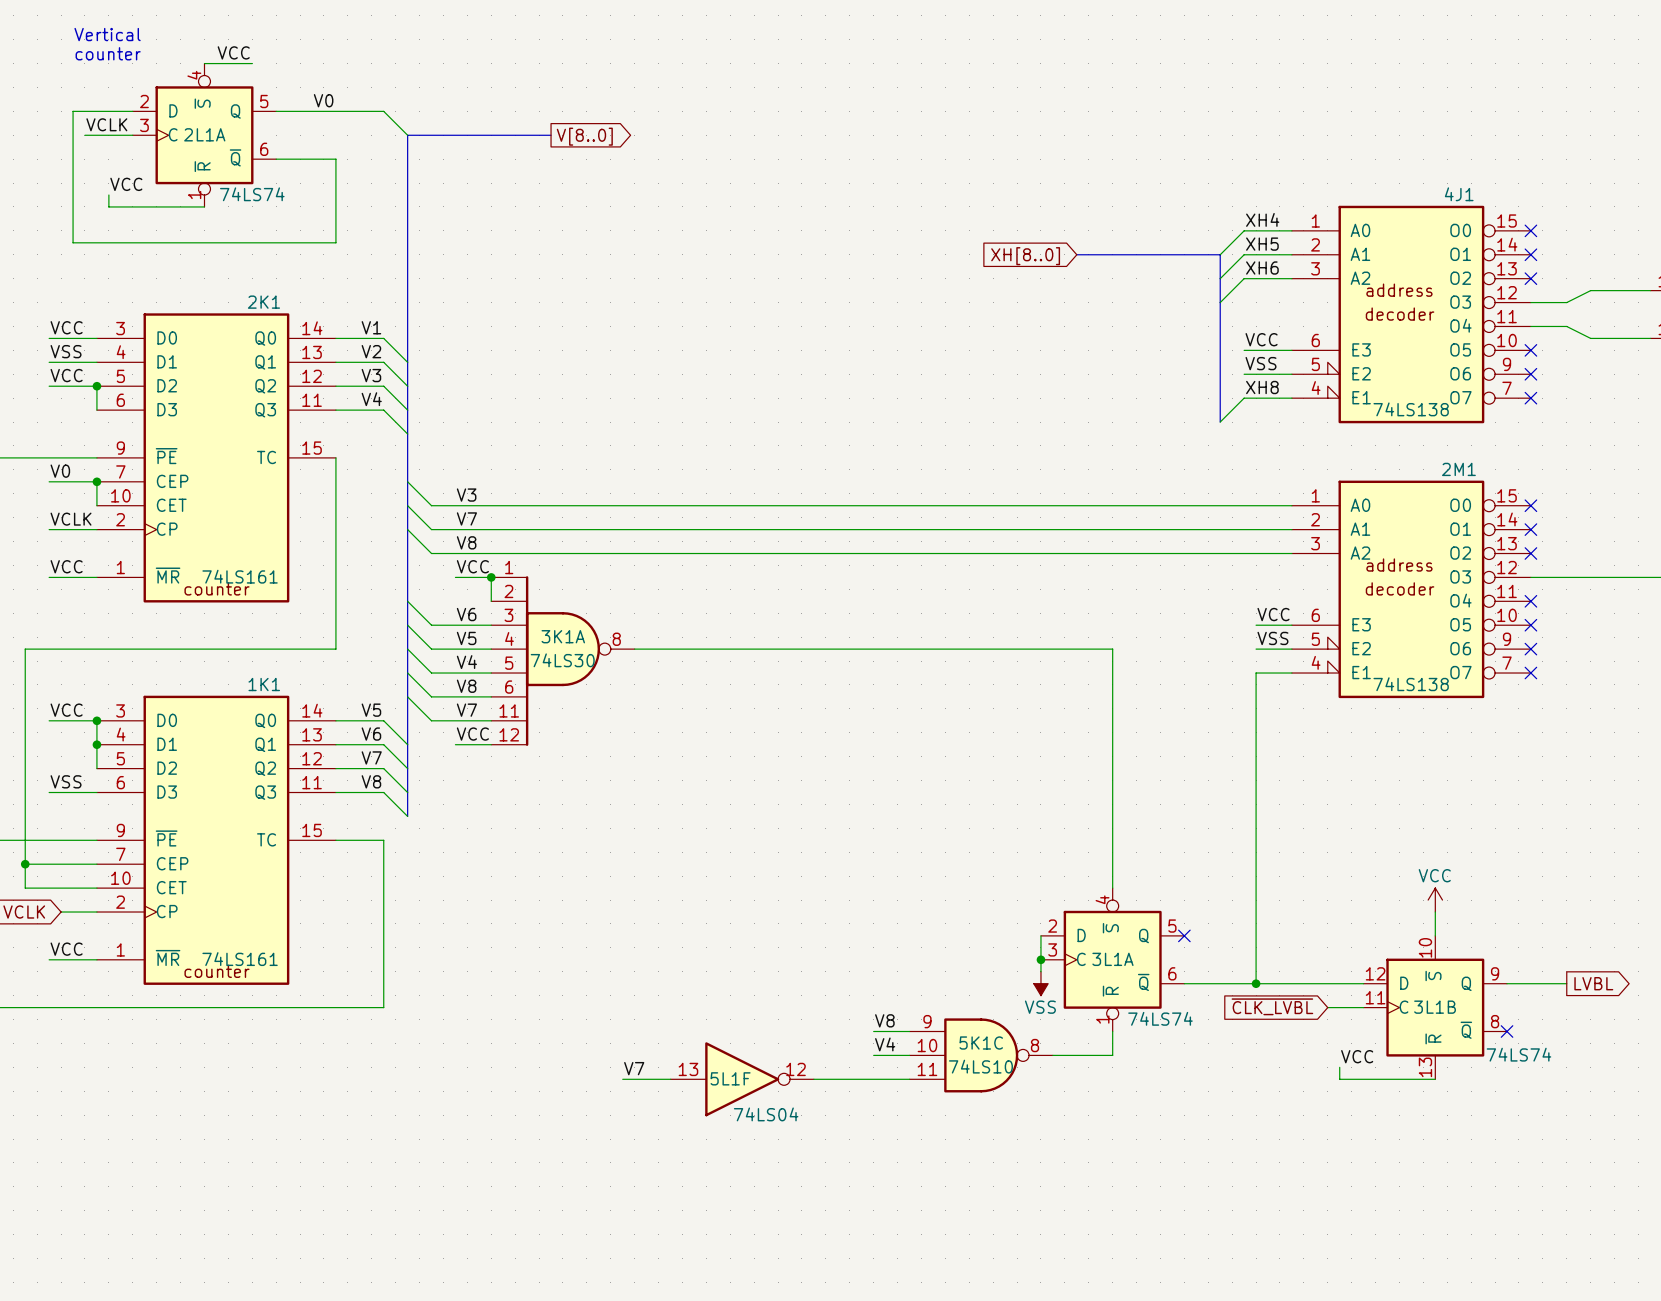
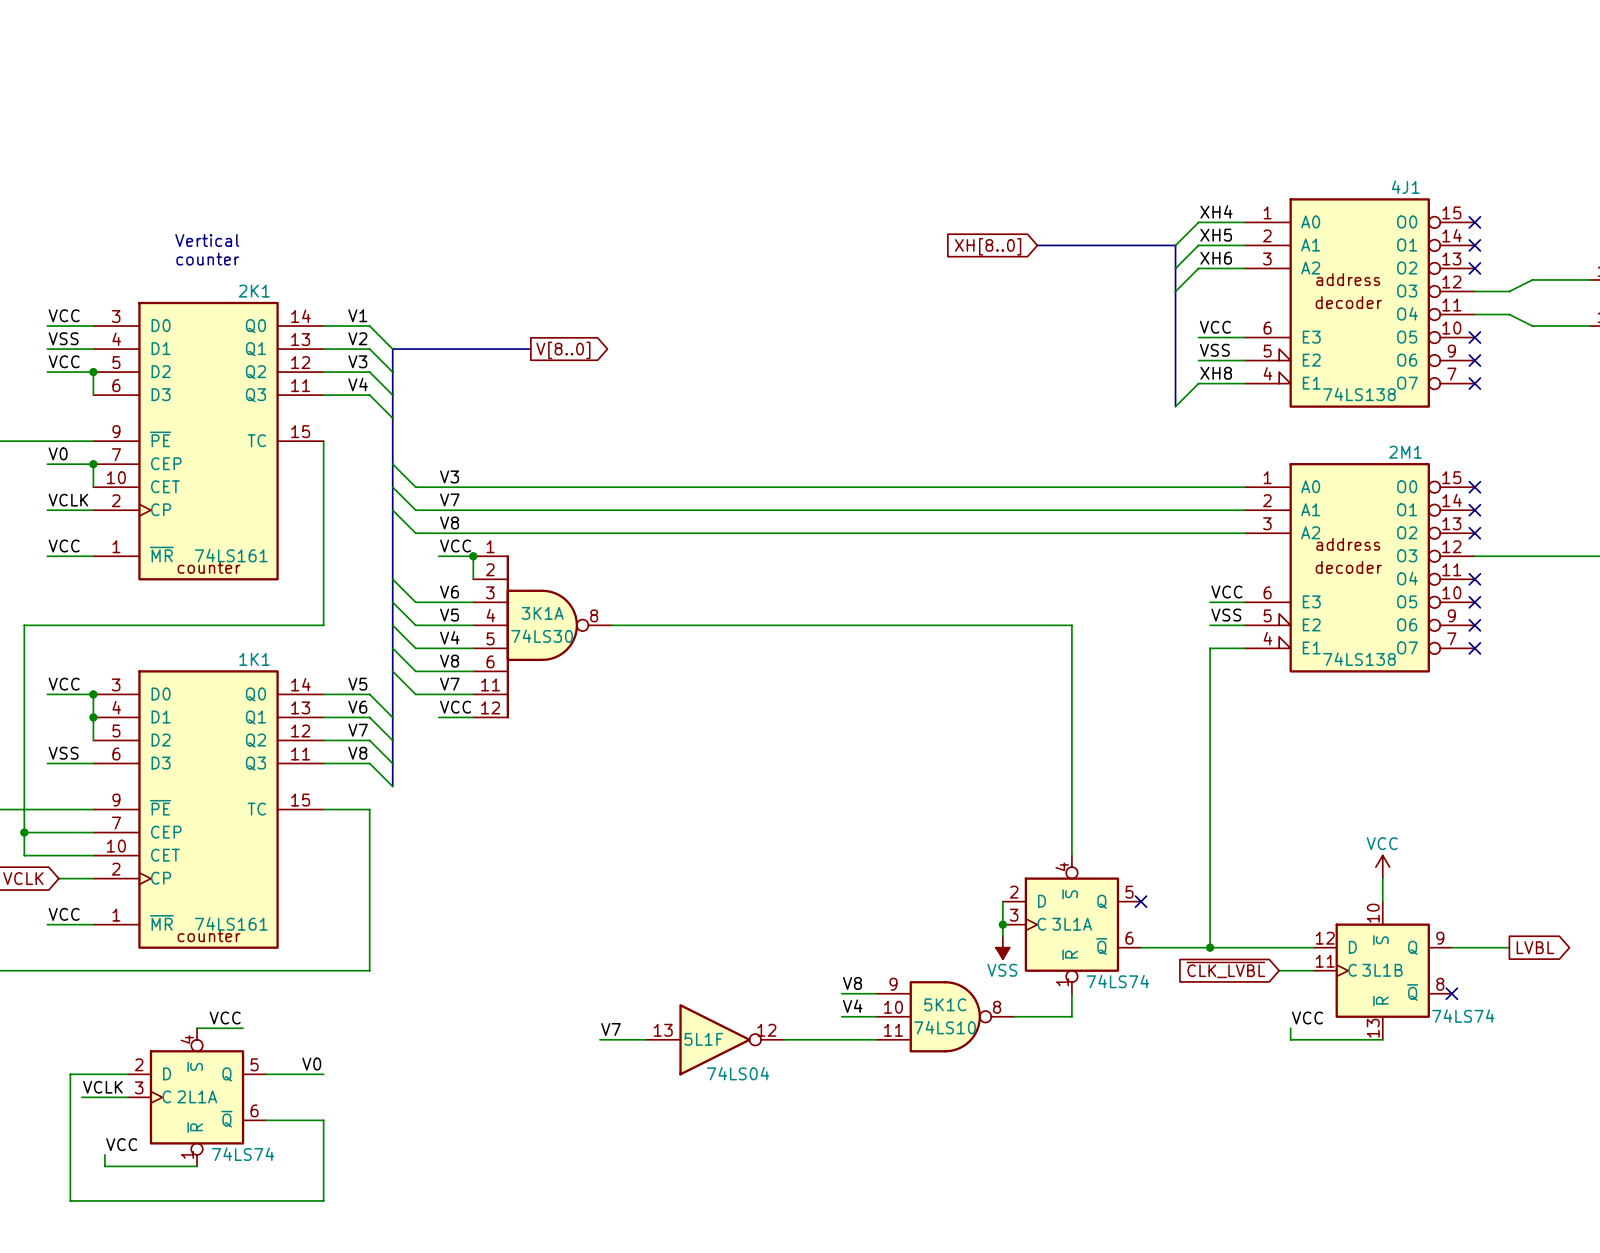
text: Vertical (107, 34) -> none
label: VCC (233, 52) -> none
text: counter (108, 53) -> none
wire: (204, 63) (252, 63) -> none
label: V0 (323, 100) -> none
wire: (132, 111) (73, 111) (73, 242) (335, 242) (335, 159) (276, 159) -> none
wire: (276, 111) (383, 111) (407, 135) -> none
label: VCLK (106, 124) -> none
wire: (84, 135) (132, 135) -> none
2L1A position: (204, 135) -> (197, 1097)
bus: (551, 135) (407, 135) (407, 362) -> (530, 349) (392, 349)
global label position: V[8..0] (584, 136) -> V[8..0] (563, 350)
label: VCC (126, 184) -> none
wire: (108, 195) (108, 206) (204, 206) -> none
text: none -> Vertical (207, 240)
text: none -> counter (207, 259)
label: none -> VCC (225, 1018)
wire: none -> (197, 1028) (243, 1028)
label: none -> V0 (311, 1064)
wire: none -> (127, 1074) (70, 1074) (70, 1200) (323, 1200) (323, 1120) (266, 1120)
wire: none -> (266, 1074) (323, 1074)
label: none -> VCLK (102, 1087)
wire: none -> (81, 1097) (127, 1097)
label: none -> VCC (121, 1144)
wire: none -> (104, 1154) (104, 1166) (197, 1166)

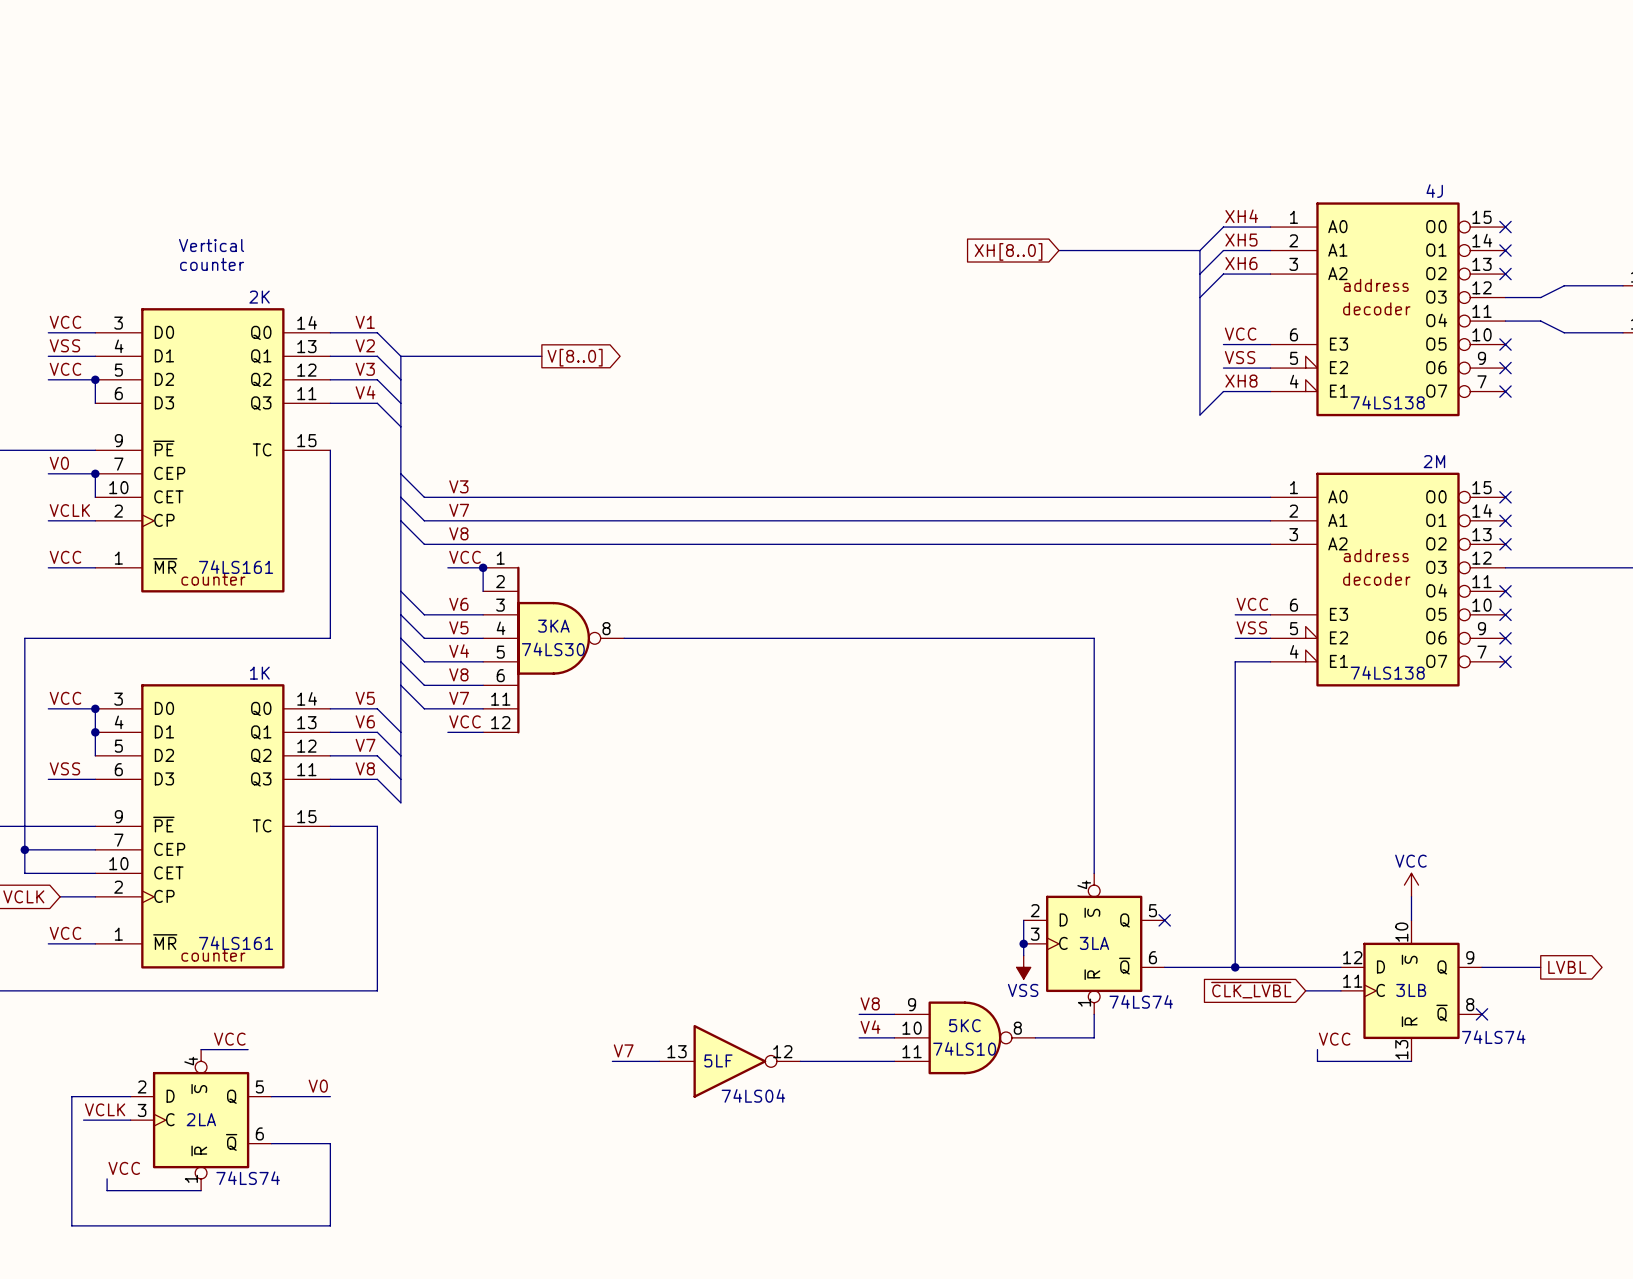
4J1 name: 4J1 (1405, 187) -> 4J (1434, 191)
2K1 name: 2K1 (254, 291) -> 2K (259, 297)
2M1 name: 2M1 (1405, 452) -> 2M (1434, 461)
3K1A name: 3K1A (542, 613) -> 3KA (553, 626)
1K1 name: 1K1 (254, 659) -> 1K (259, 673)
3L1A name: 3L1A (1072, 924) -> 3LA (1094, 943)
3L1B name: 3L1B (1382, 970) -> 3LB (1411, 990)
5K1C name: 5K1C (945, 1004) -> 5KC (964, 1025)
5L1F name: 5L1F (703, 1039) -> 5LF (718, 1060)
2L1A name: 2L1A (197, 1096) -> 2LA (201, 1119)

